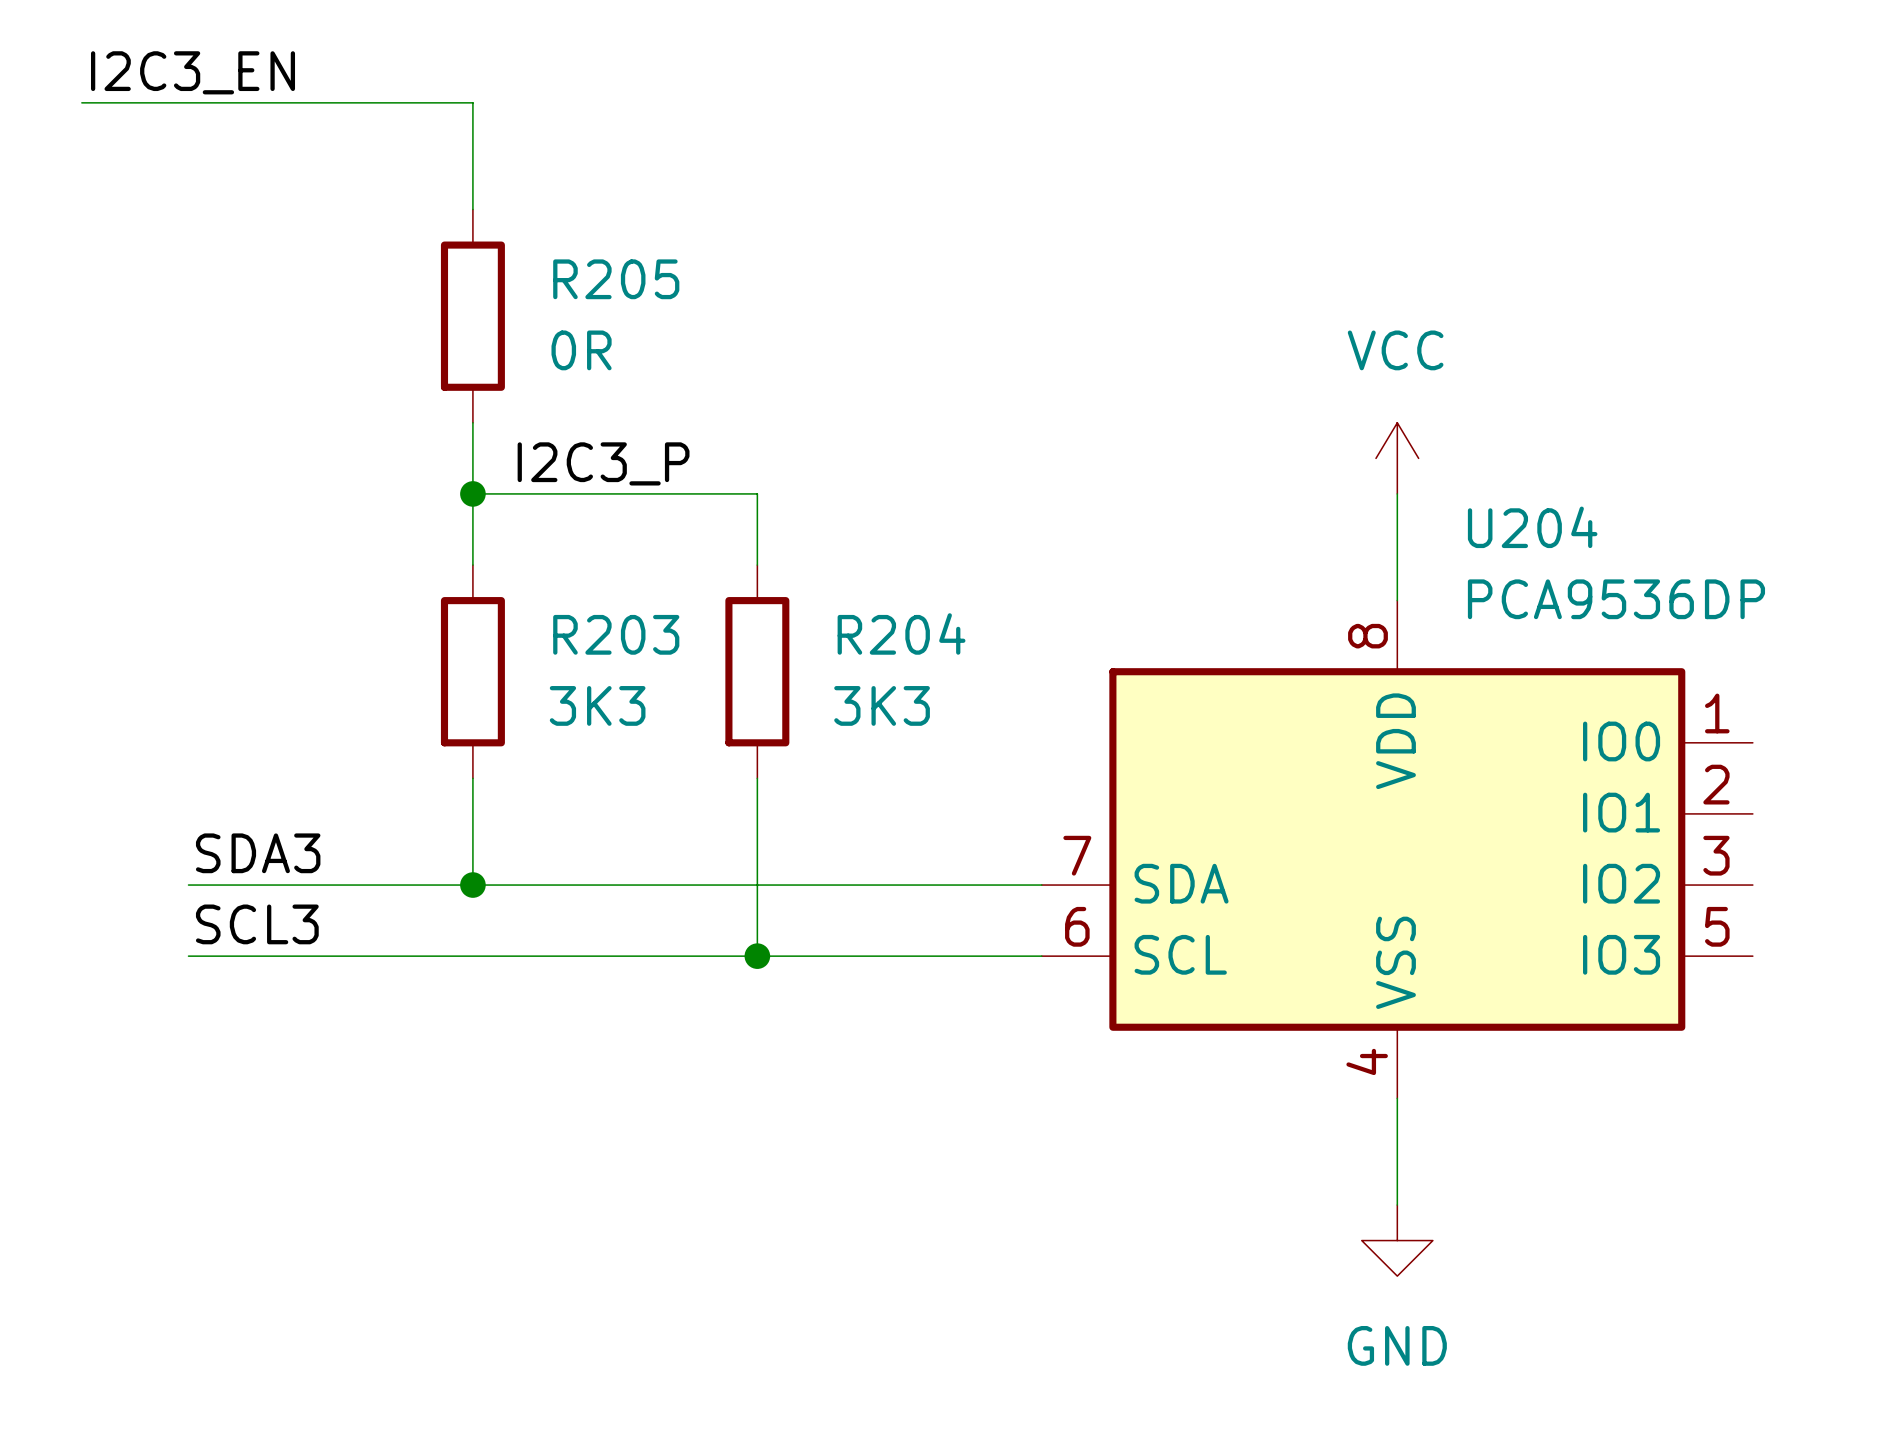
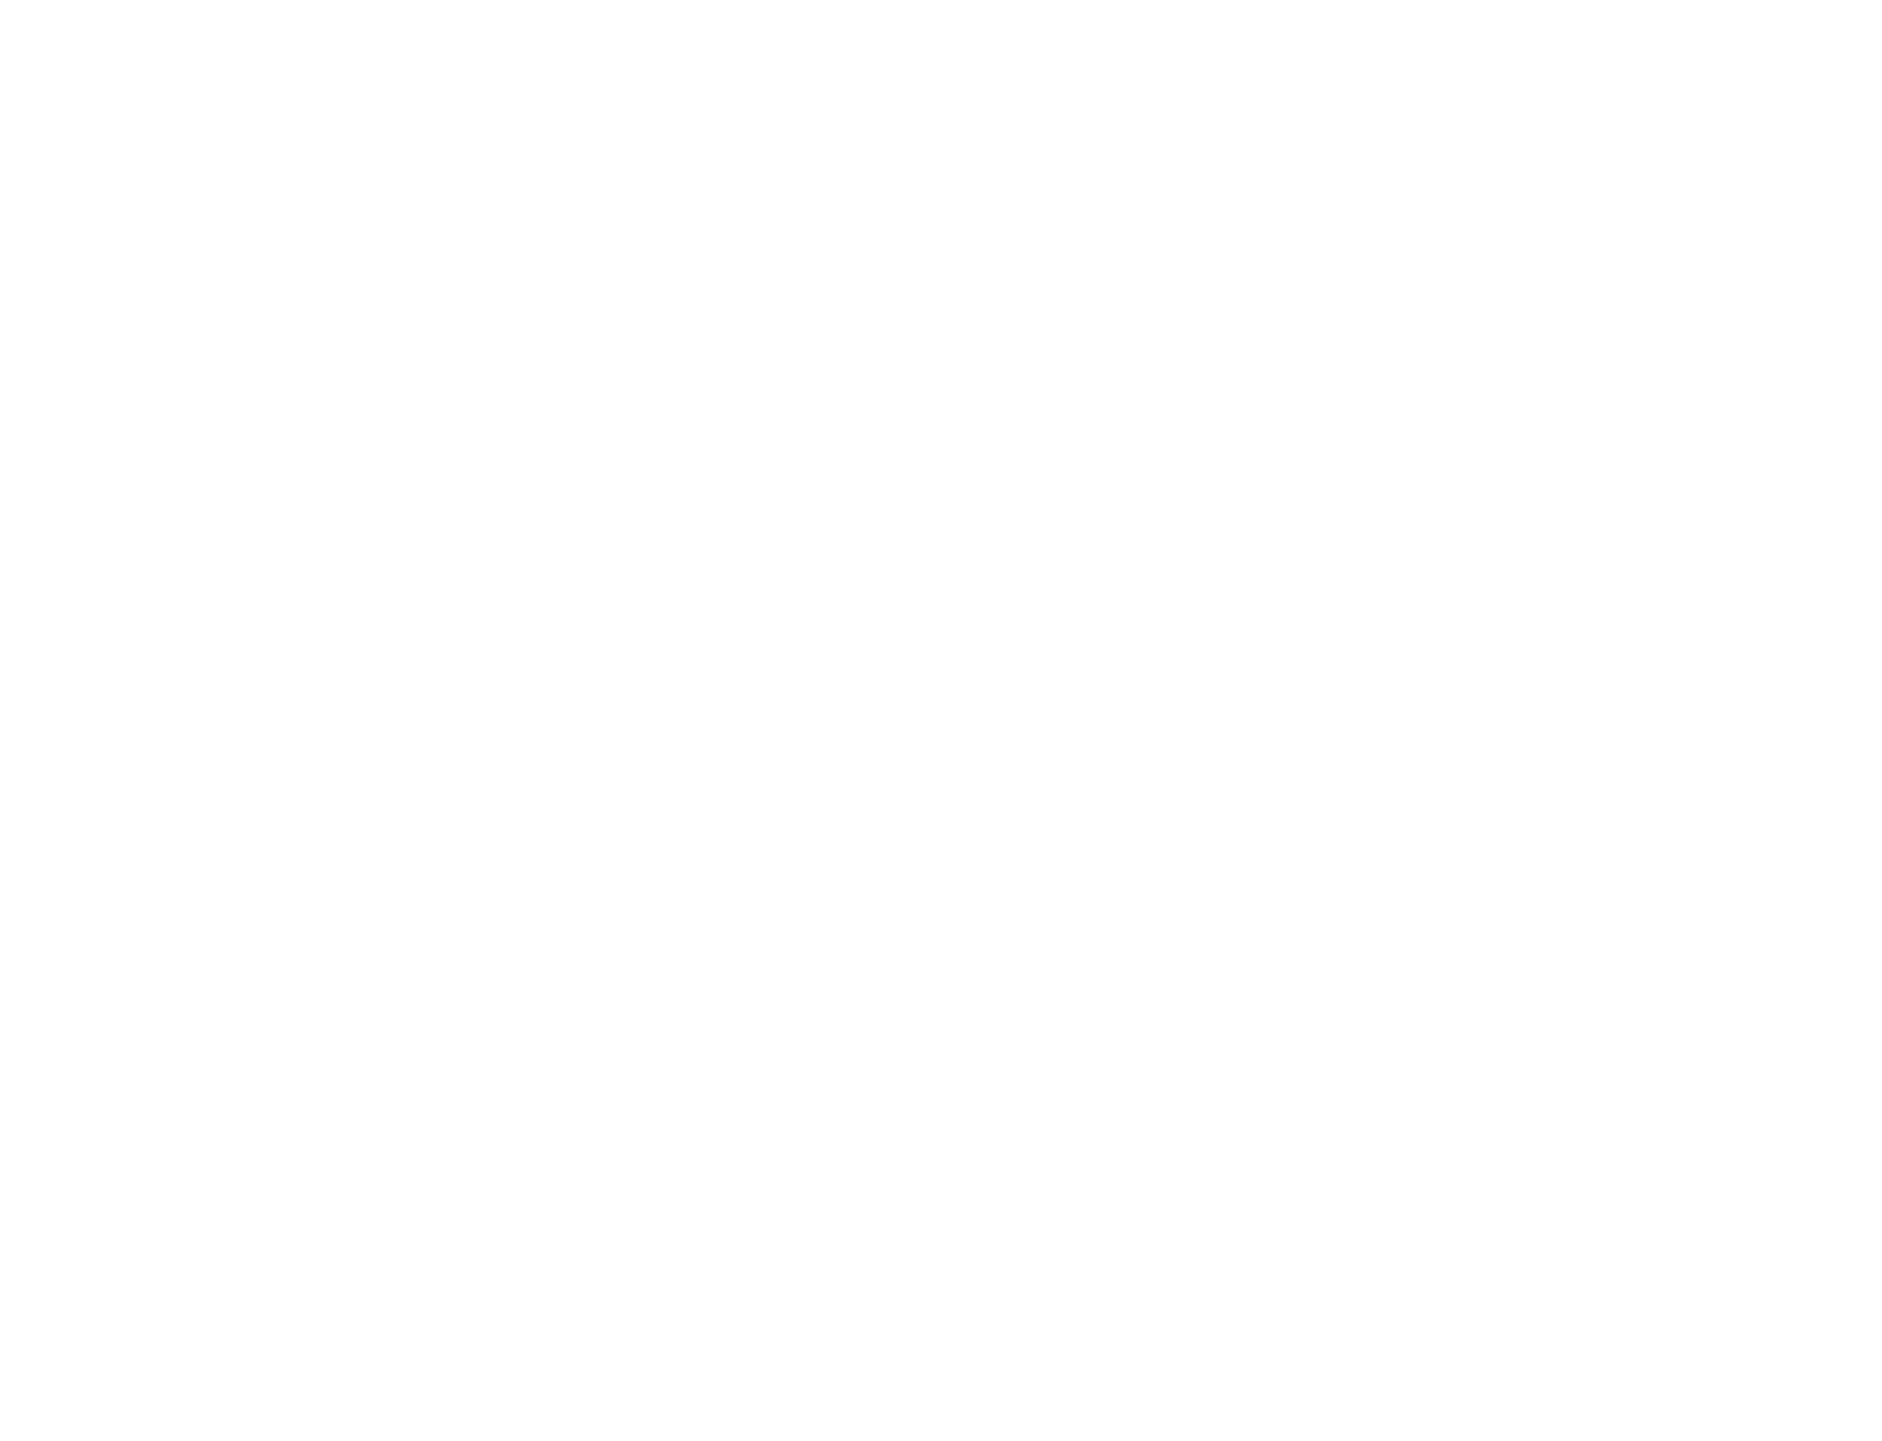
label: I2C3_EN (193, 72) -> none
wire: (81, 102) (472, 102) (472, 209) -> none
R205: 0R (472, 316) -> none
wire: (472, 422) (472, 565) -> none
power symbol: VCC (1397, 458) -> none
label: I2C3_P (603, 463) -> none
wire: (472, 493) (757, 493) (757, 565) -> none
junction: (472, 493) -> none
wire: (1397, 493) (1397, 600) -> none
R203: 3K3 (472, 671) -> none
R204: 3K3 (757, 671) -> none
wire: (472, 778) (472, 885) -> none
wire: (757, 778) (757, 956) -> none
U204: PCA9536DP (1397, 849) -> none
label: SDA3 (258, 853) -> none
wire: (188, 885) (1041, 885) -> none
junction: (472, 885) -> none
label: SCL3 (257, 924) -> none
wire: (188, 956) (1041, 956) -> none
junction: (757, 956) -> none
wire: (1397, 1098) (1397, 1205) -> none
power symbol: GND (1397, 1240) -> none

